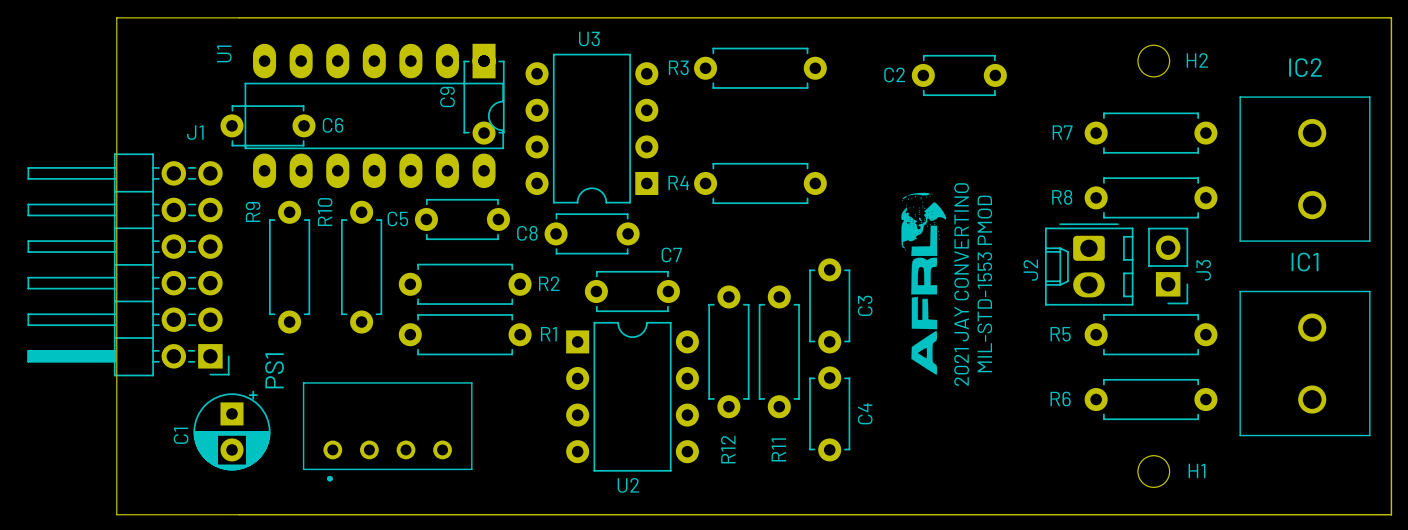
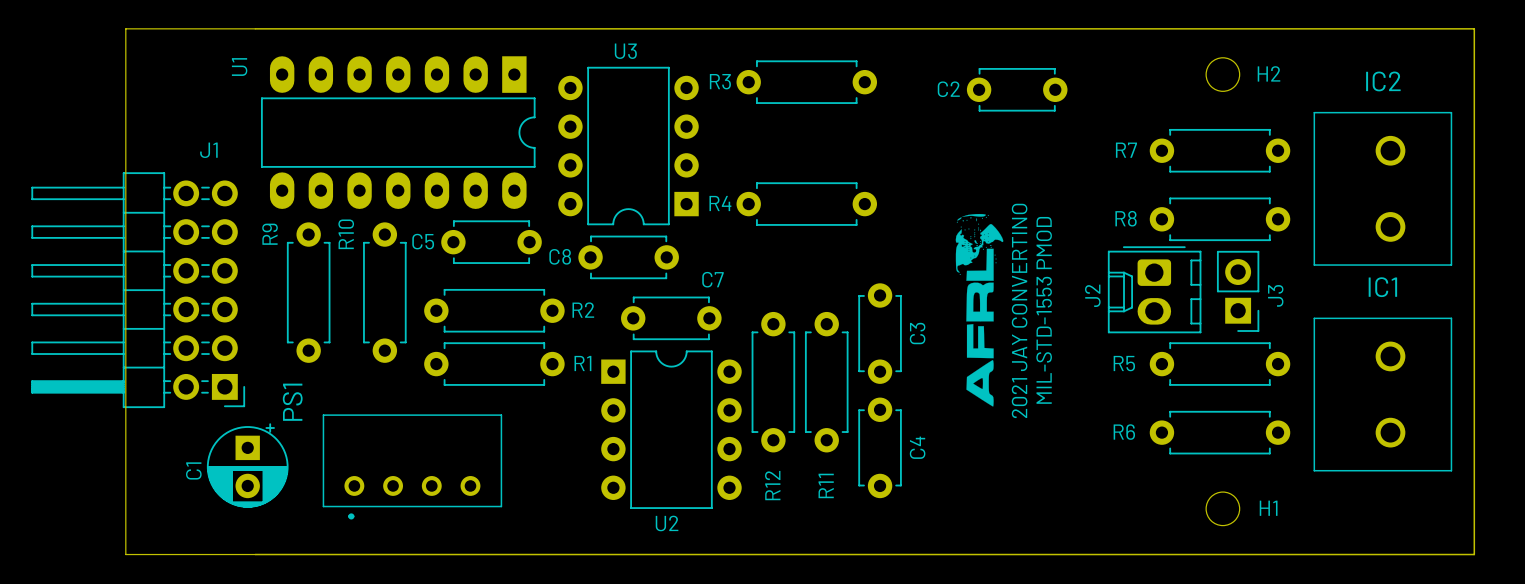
C9: (484, 97) -> none
C6: (268, 125) -> none

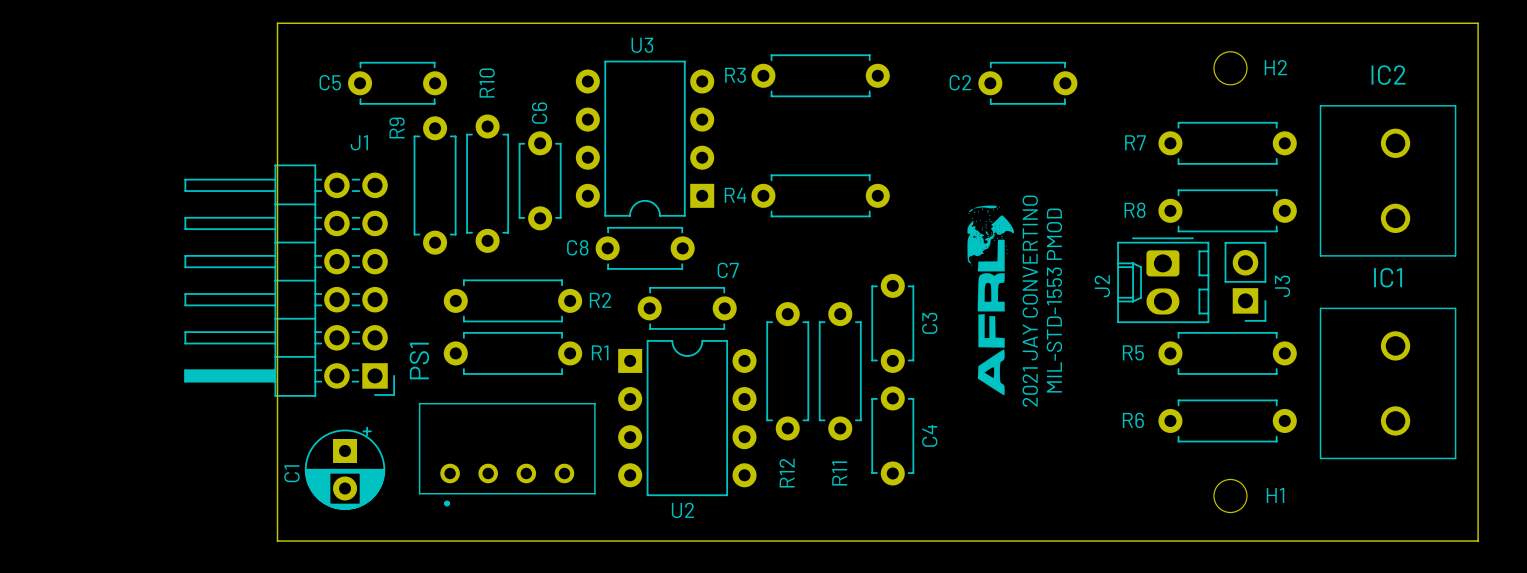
board edge: (255, 28) (125, 28) (125, 554) (255, 554) -> (277, 23) (277, 541)
U1: (398, 132) -> none
C6: none -> (540, 180)
R10 name position: R10 (346, 234) -> R10 (487, 83)
C5 position: (491, 242) -> (397, 83)
J1 position: (138, 290) -> (289, 280)
R9 position: (308, 292) -> (435, 185)
R10 position: (384, 292) -> (487, 183)
PS1 name position: PS1 (292, 402) -> PS1 (419, 361)
C1 position: (247, 465) -> (345, 468)
PS1 position: (412, 466) -> (507, 454)

